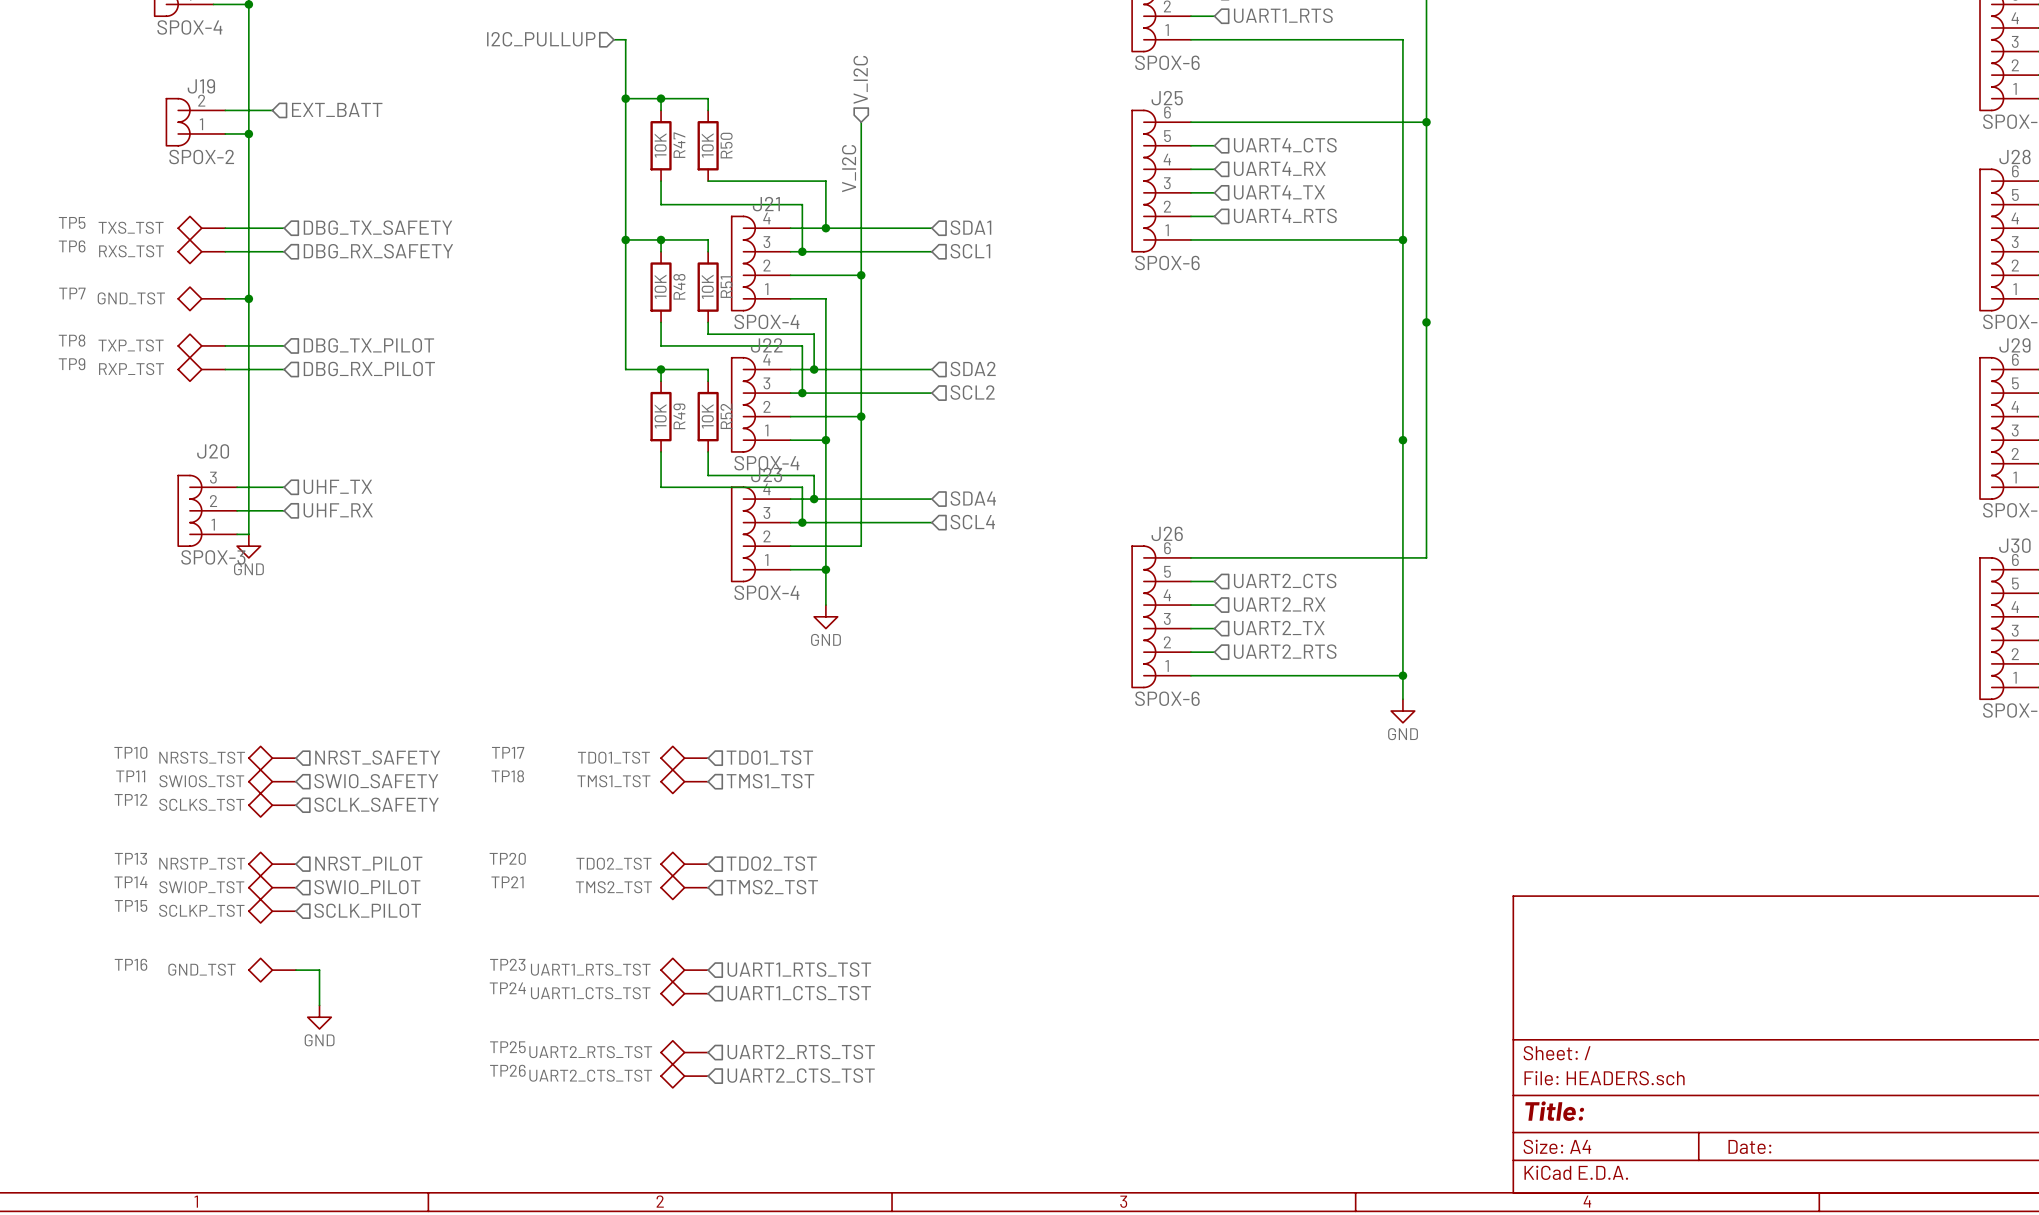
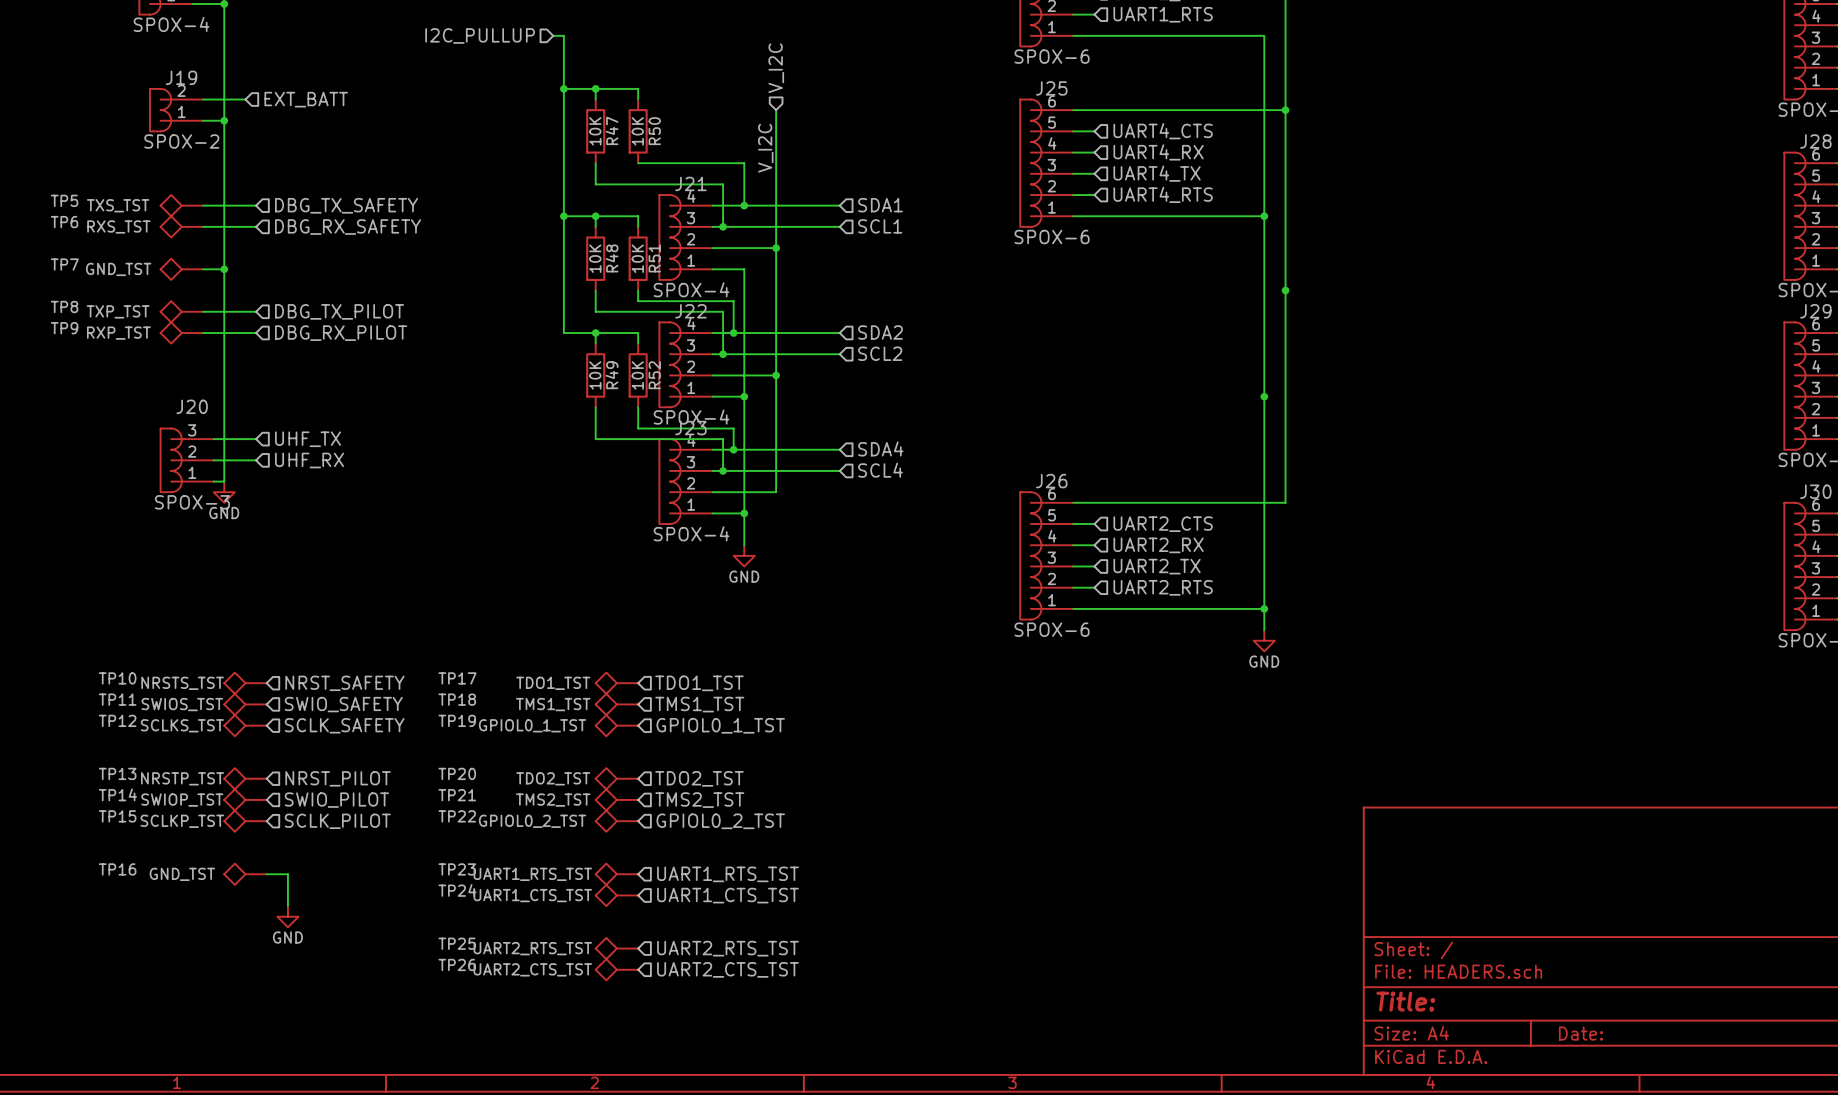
hierarchical label: none -> GPIOL0_1_TST (720, 725)
TP19: none -> GPIOL0_1_TST (616, 725)
hierarchical label: none -> GPIOL0_2_TST (720, 821)
TP22: none -> GPIOL0_2_TST (616, 821)

